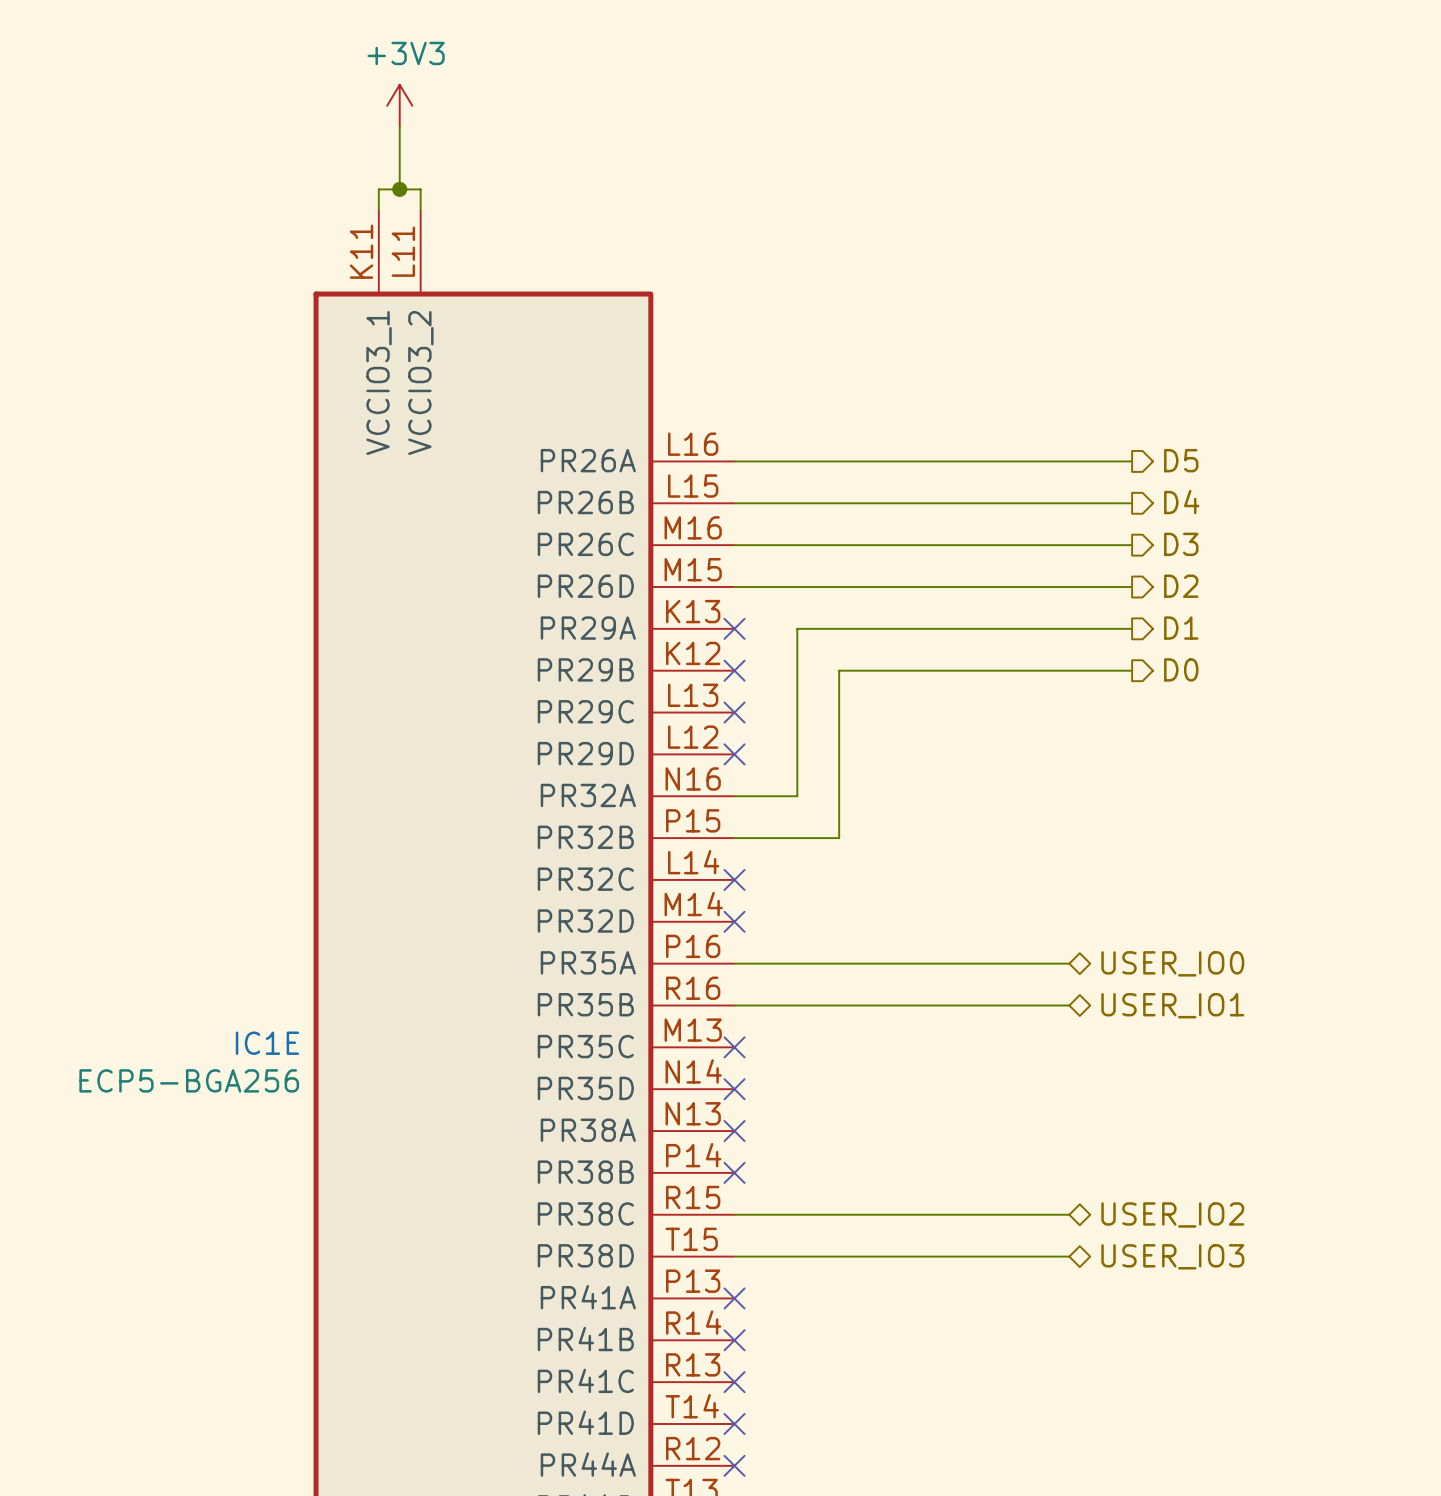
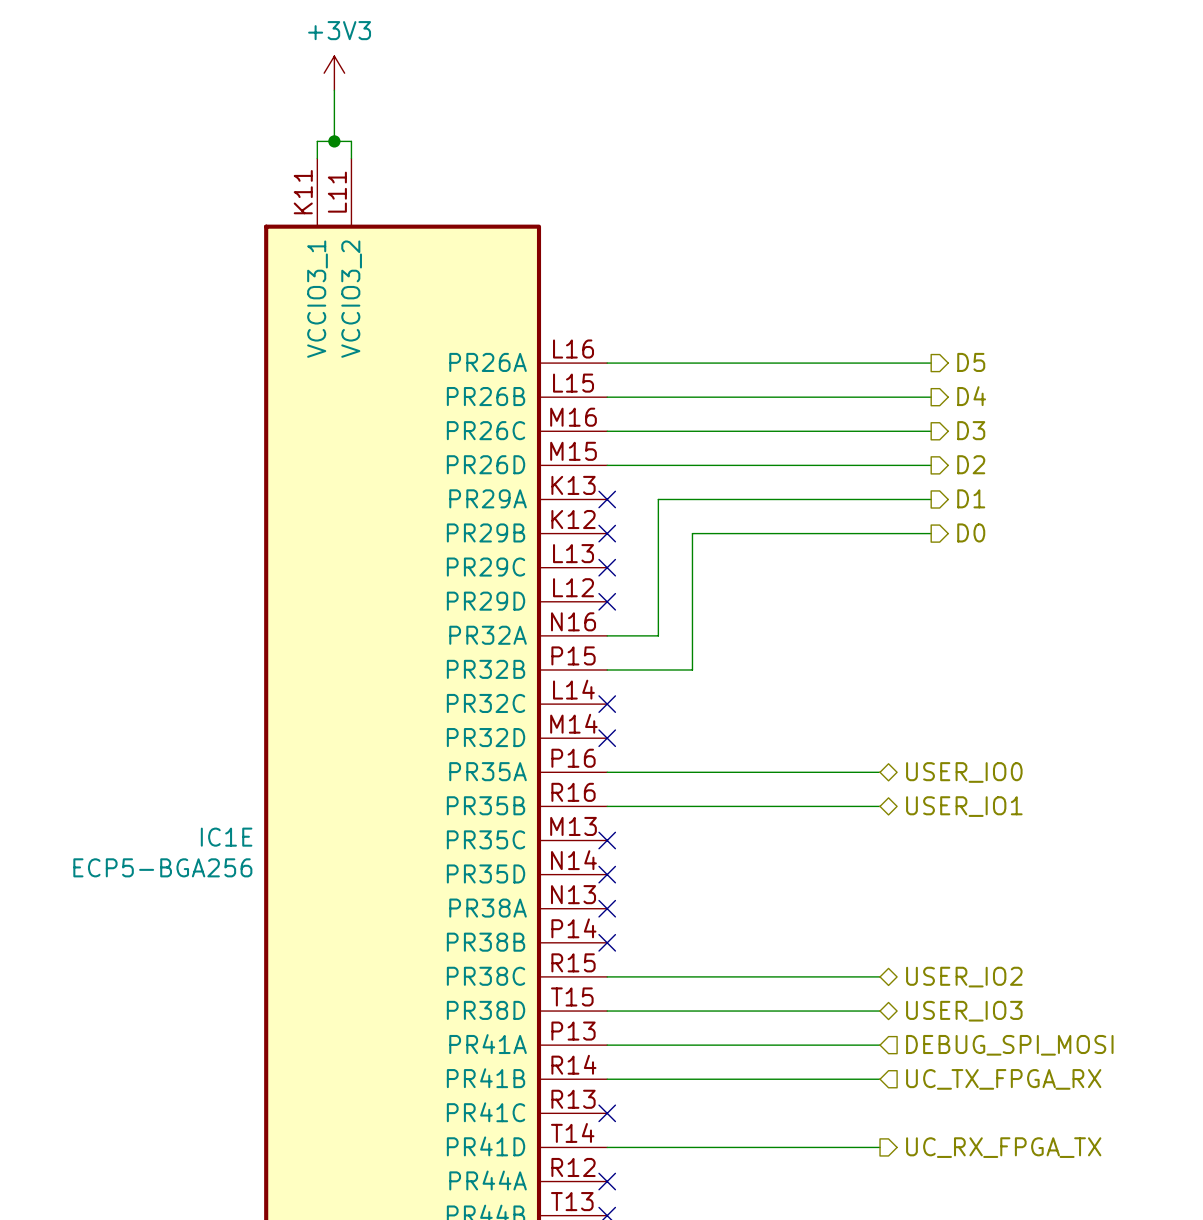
wire: none -> (607, 1045) (880, 1045)
no-connect mark: (734, 1298) -> none
hierarchical label: none -> DEBUG_SPI_MOSI (1009, 1045)
wire: none -> (607, 1079) (880, 1079)
no-connect mark: (734, 1340) -> none
hierarchical label: none -> UC_TX_FPGA_RX (1003, 1079)
wire: none -> (607, 1147) (880, 1147)
no-connect mark: (734, 1424) -> none
hierarchical label: none -> UC_RX_FPGA_TX (1003, 1147)

